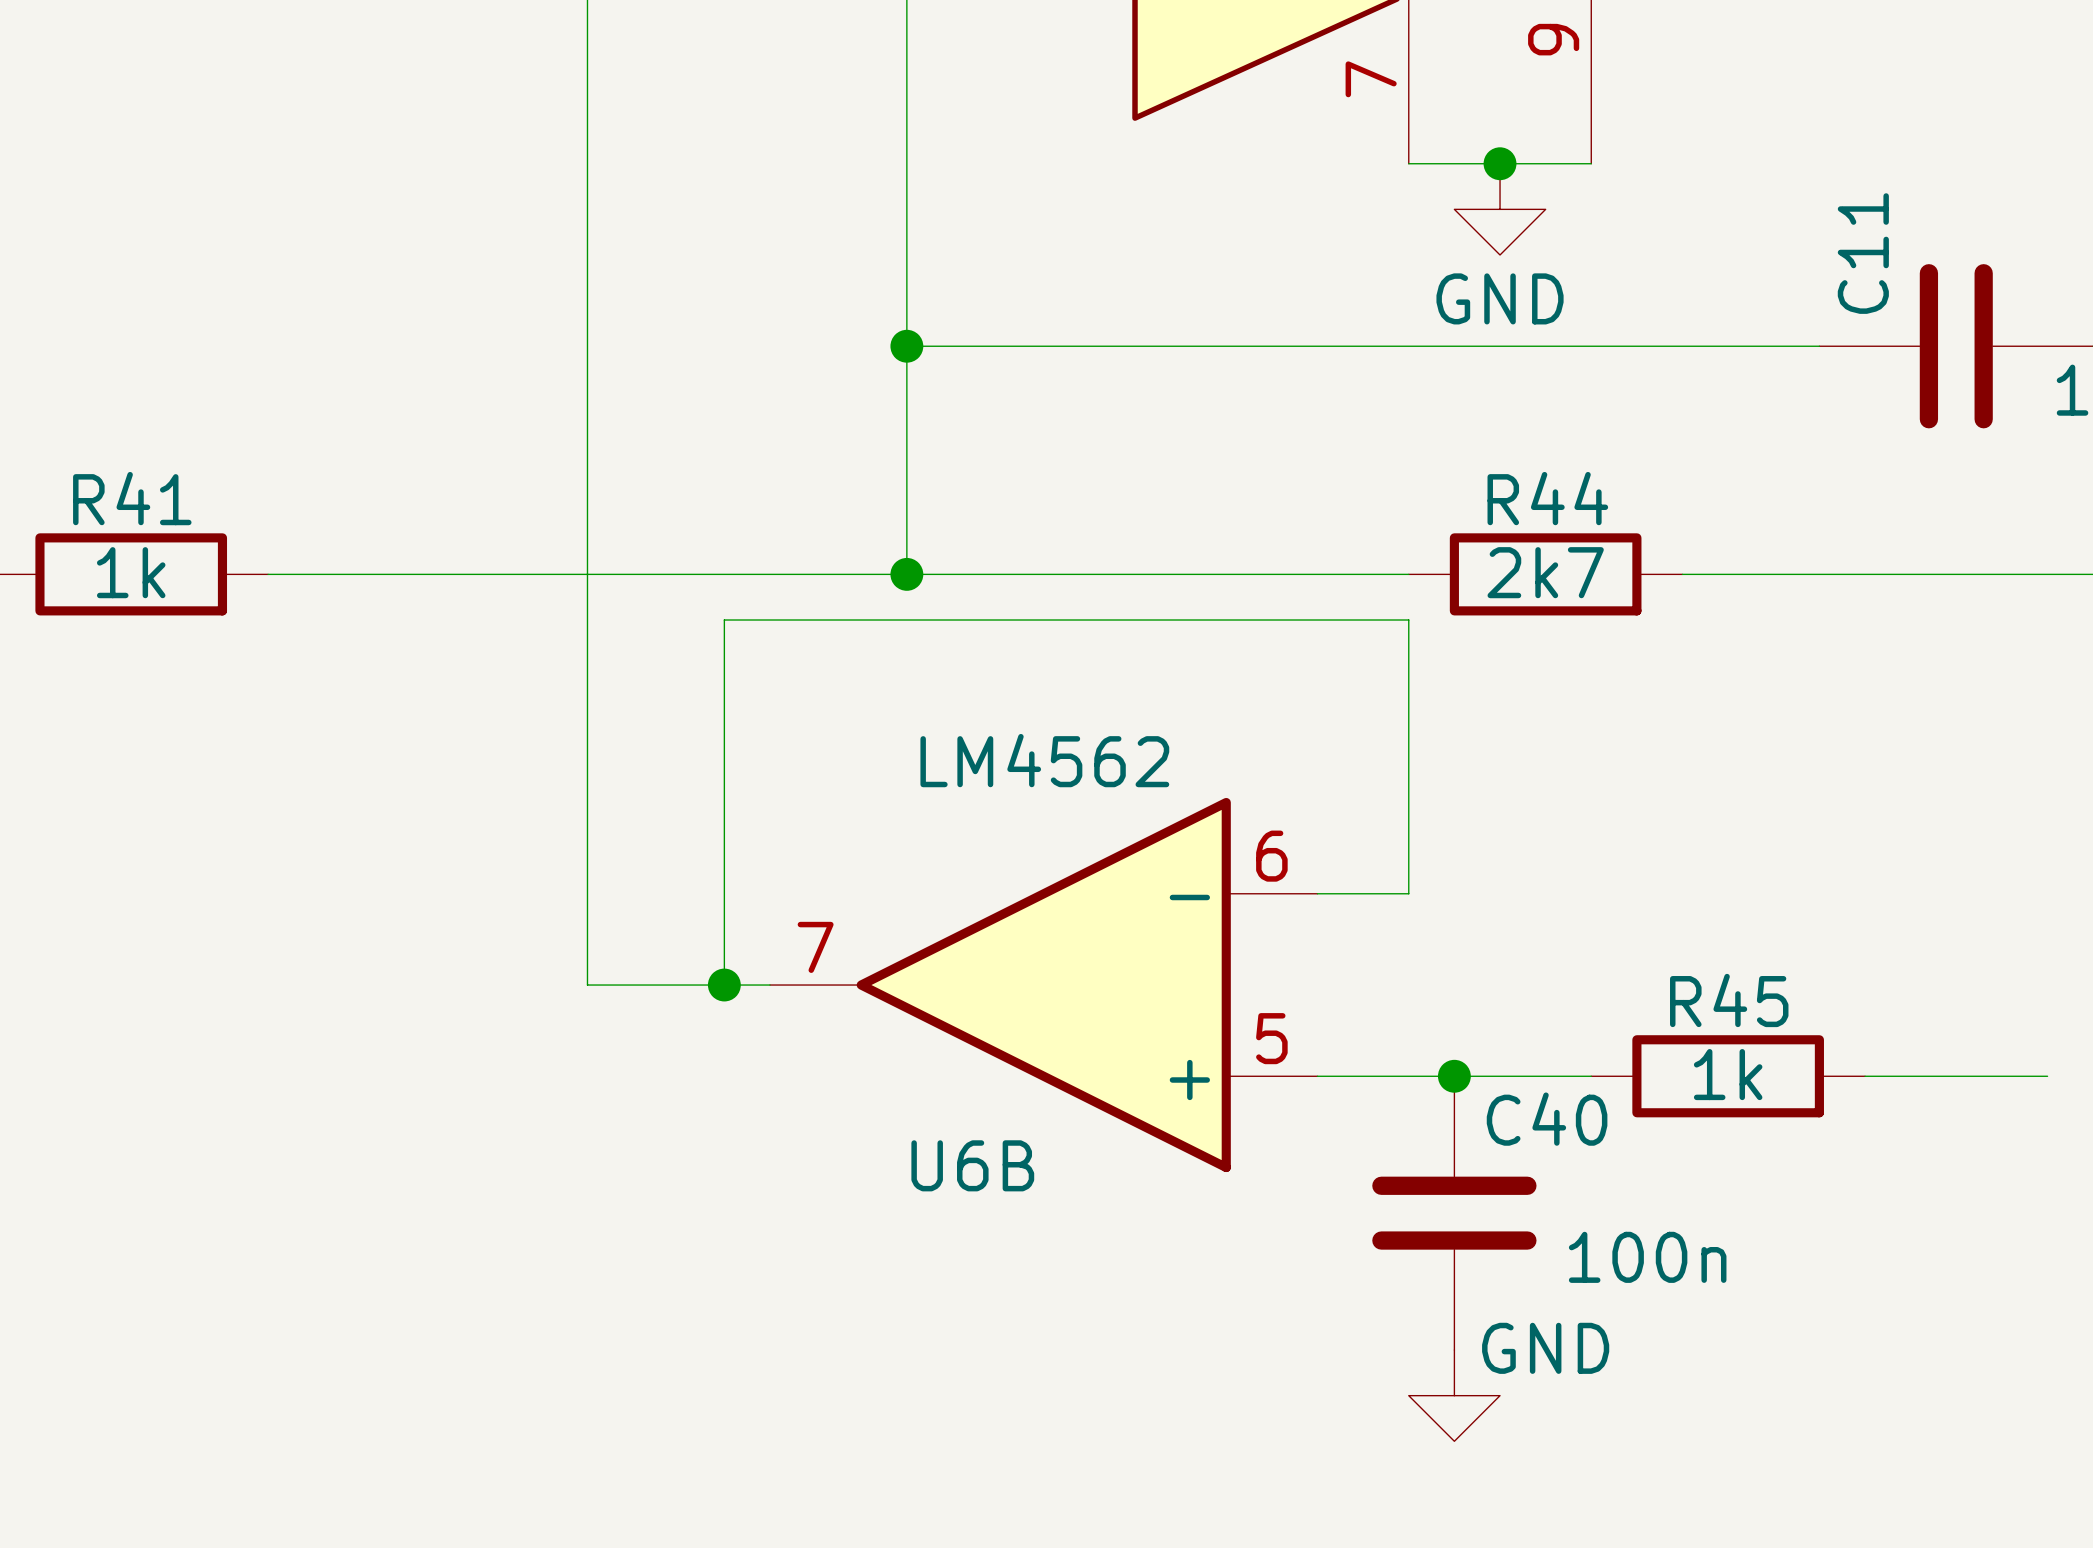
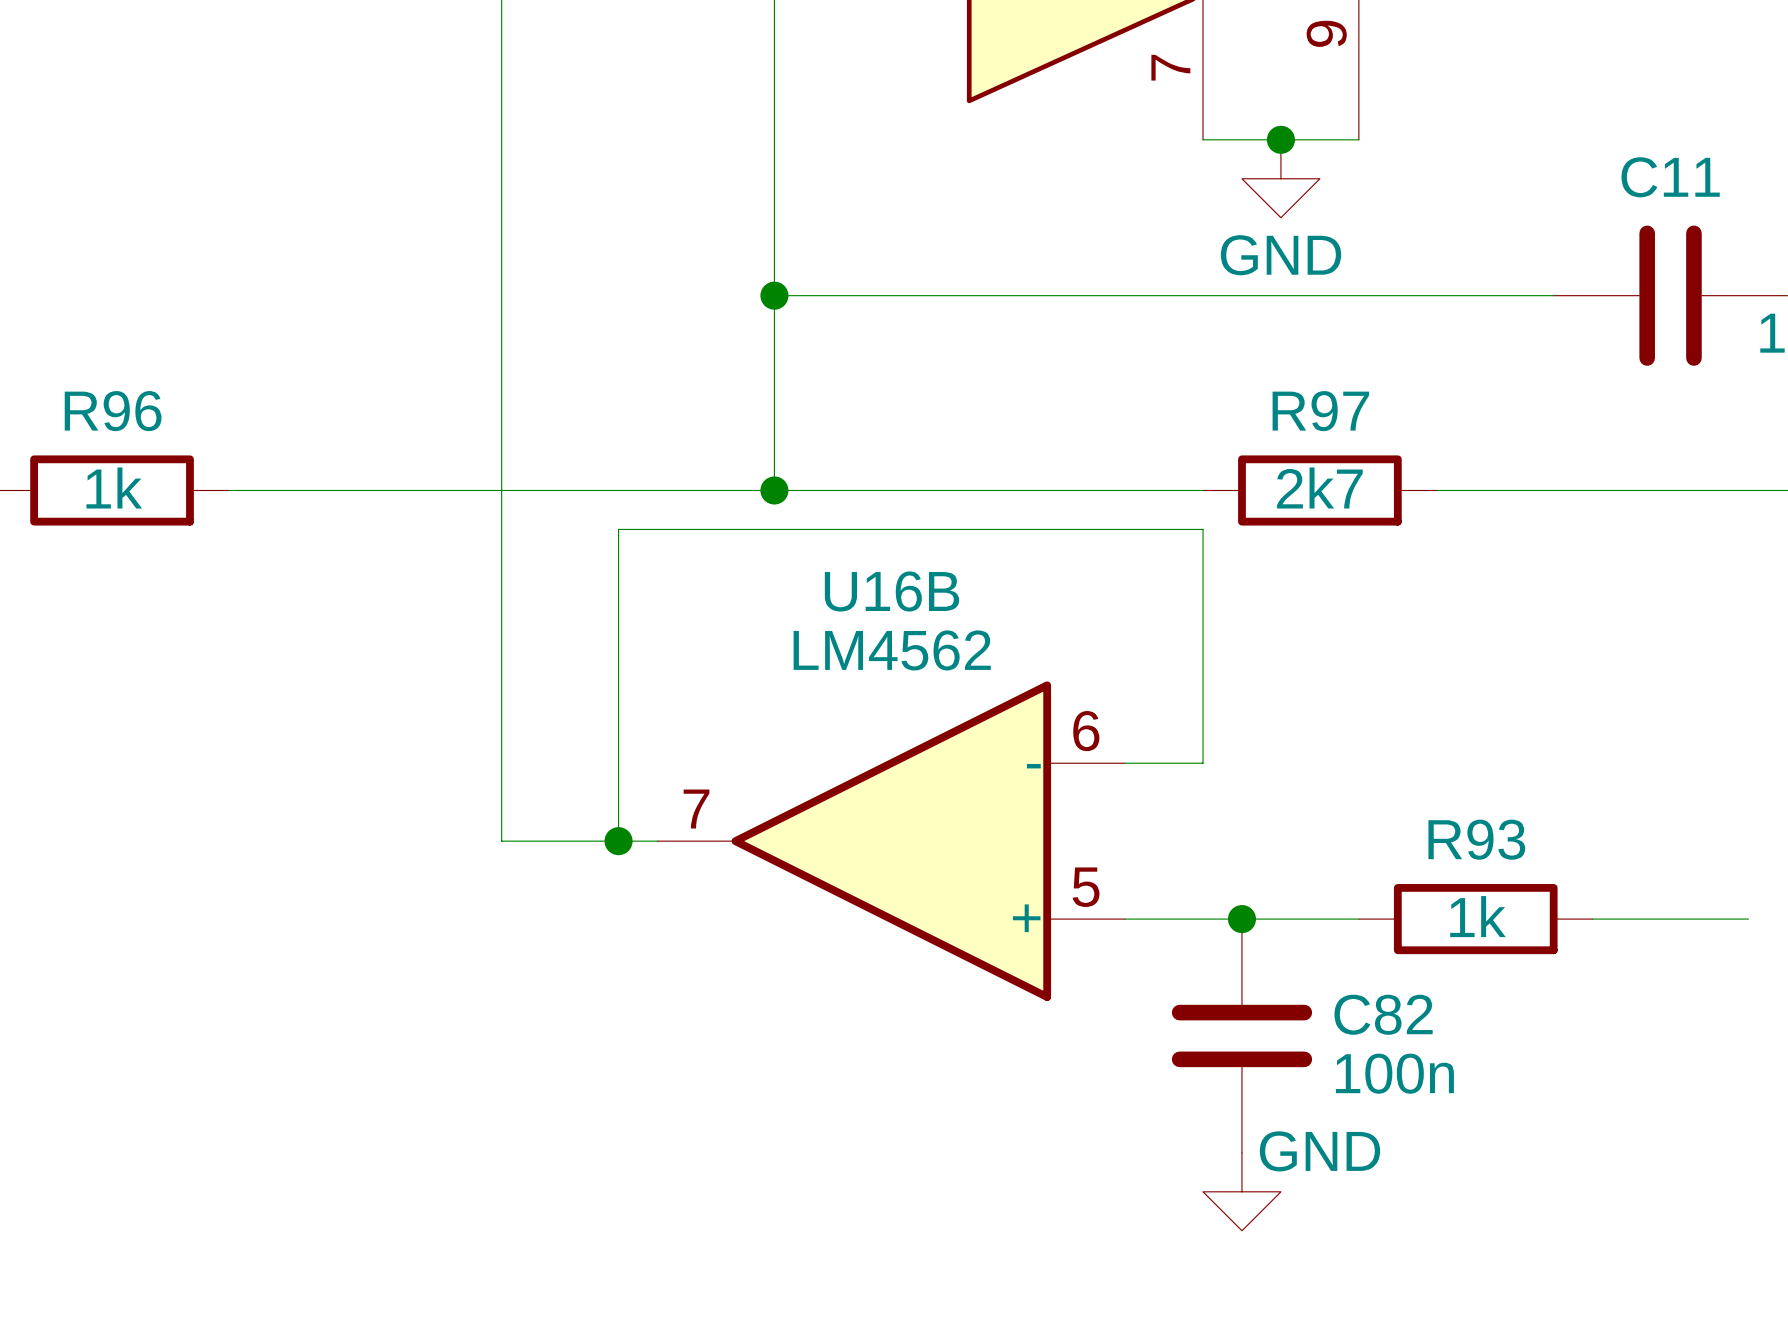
C11 name rotation: 0° (1863, 253) -> 90° clockwise (1670, 177)
R41 name: R41 (132, 498) -> R96 (113, 411)
R44 name: R44 (1547, 498) -> R97 (1320, 411)
R45 name: R45 (1729, 1000) -> R93 (1476, 839)
C40 name: C40 (1547, 1119) -> C82 (1383, 1014)
U6B name: U6B (972, 1165) -> U16B (892, 591)

